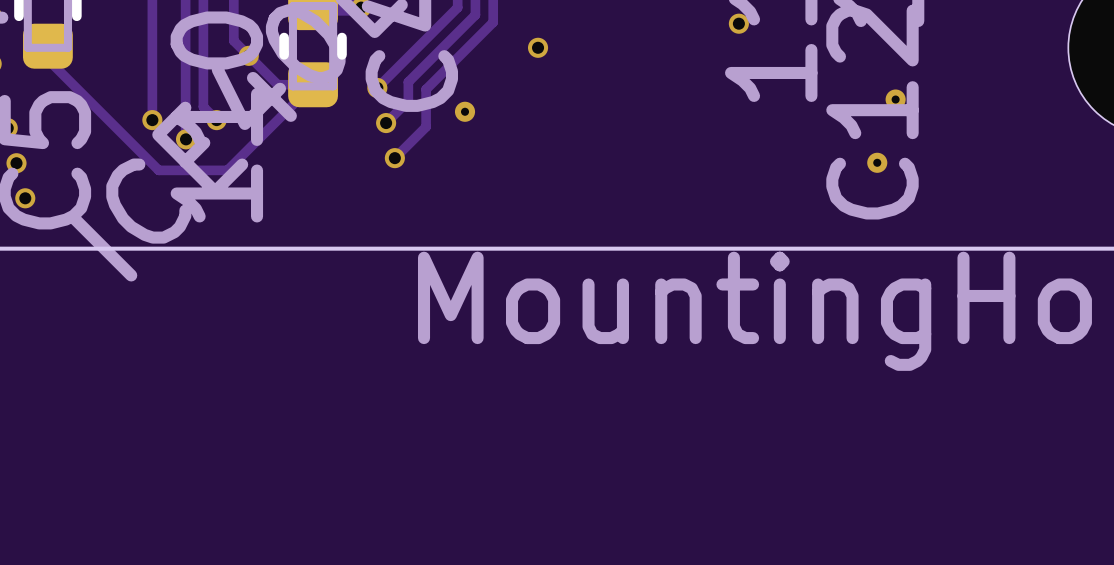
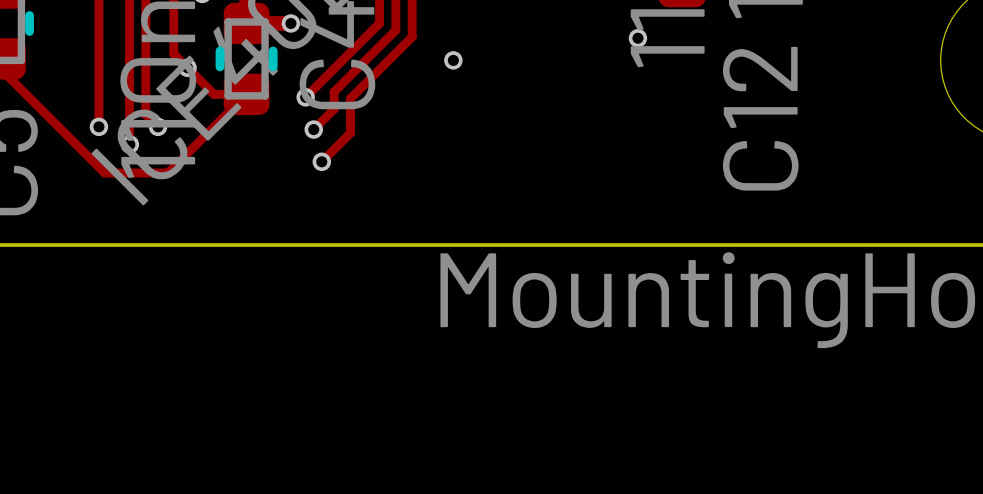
via: (895, 99) -> none
via: (465, 111) -> none
via: (877, 162) -> none

